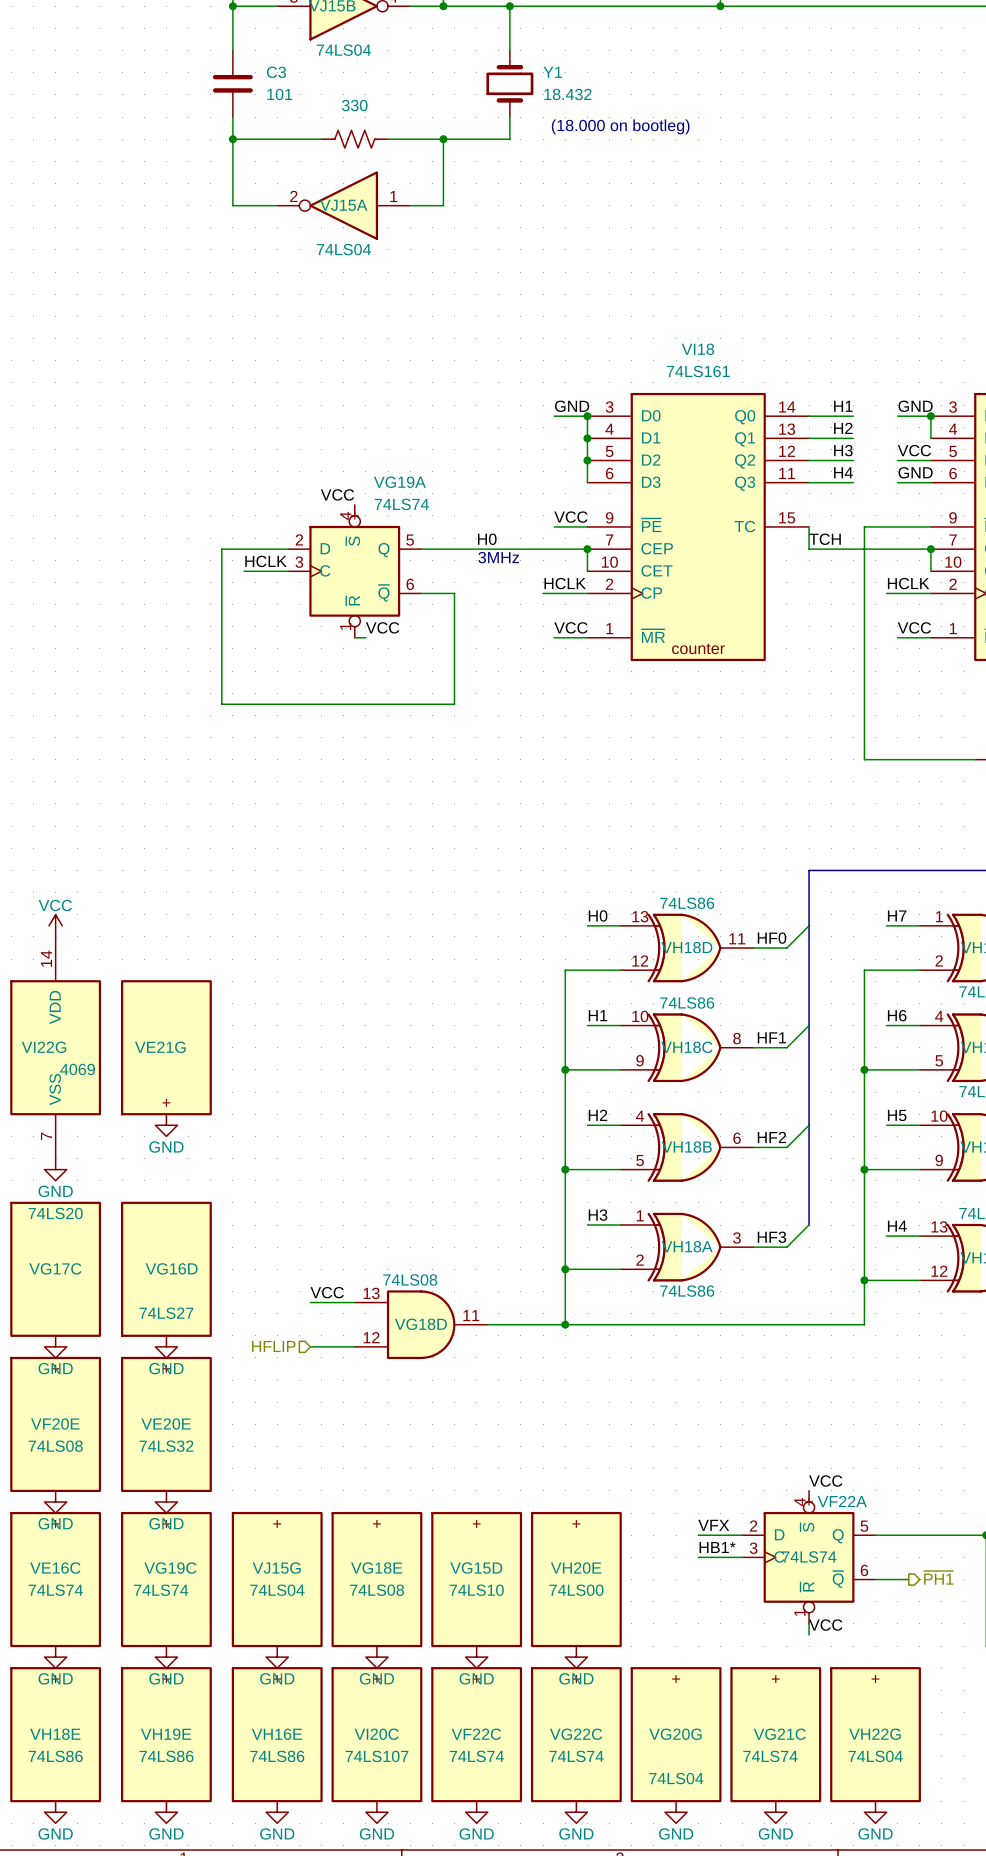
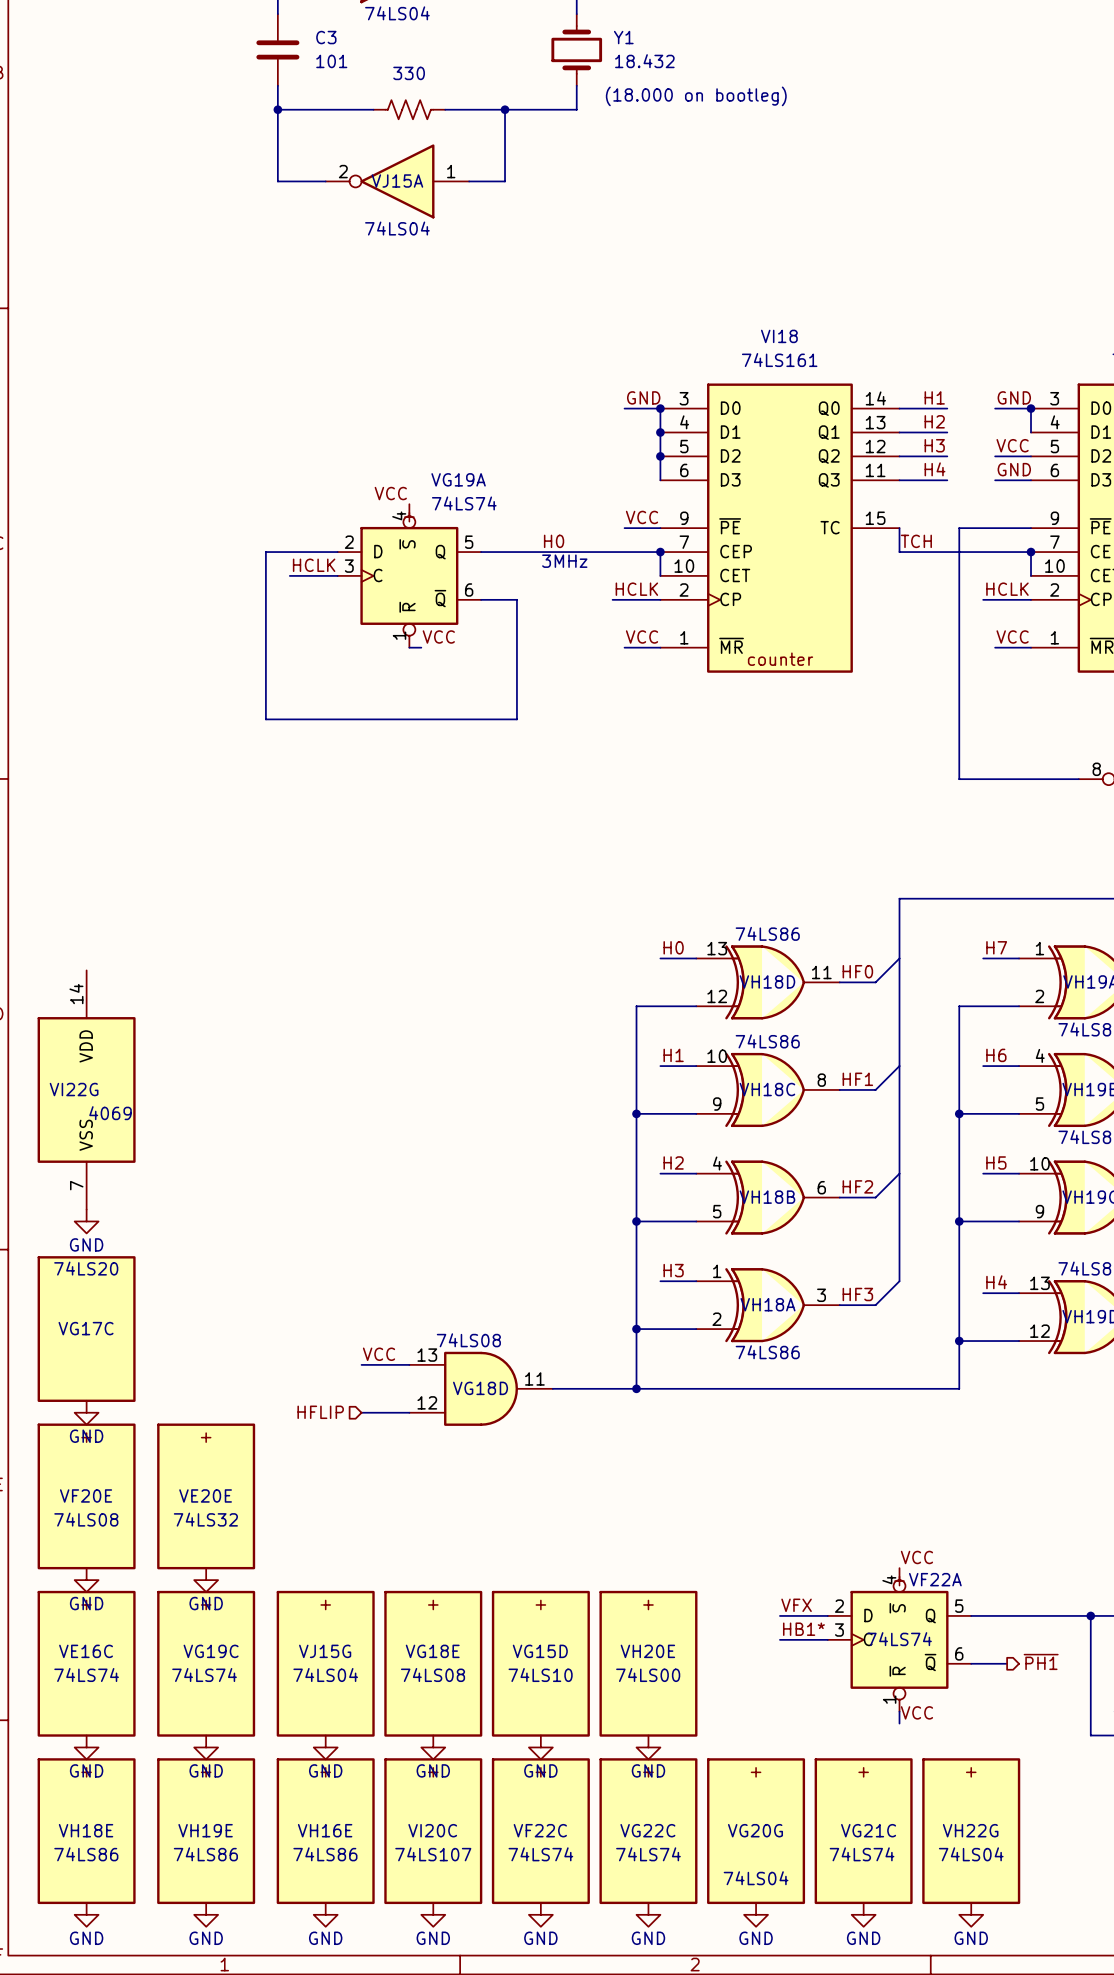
power symbol: VCC (55, 925) -> none
VE21G: (166, 1047) -> none
power symbol: GND (166, 1125) -> none
VG16D: 74LS27 (166, 1269) -> none
power symbol: GND (166, 1346) -> none

